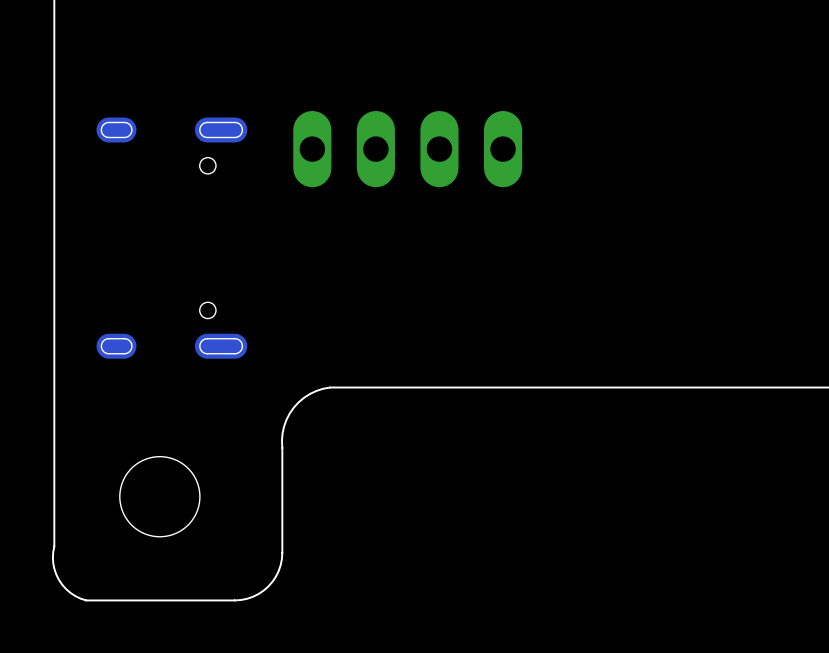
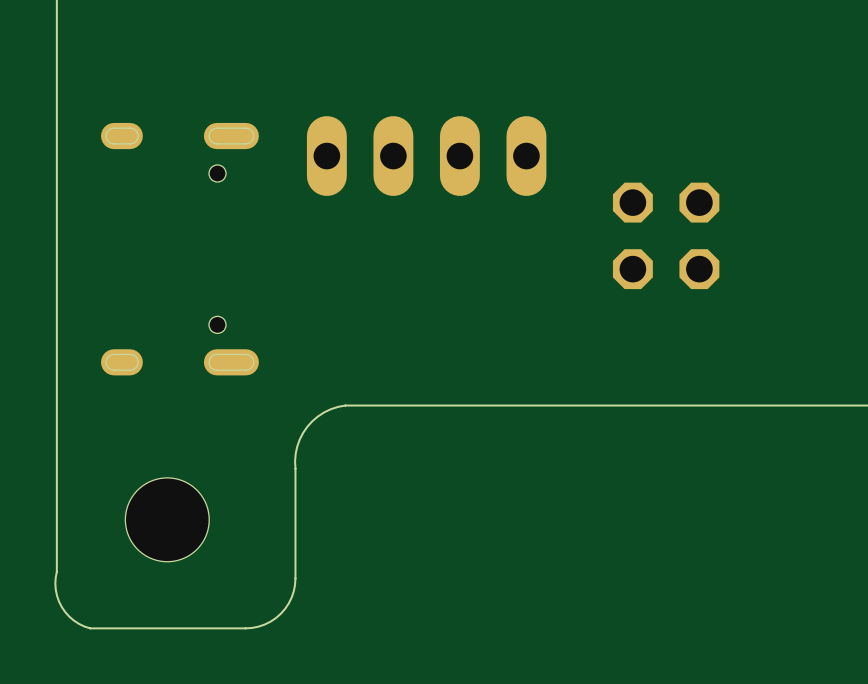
part: none -> (666, 235)

